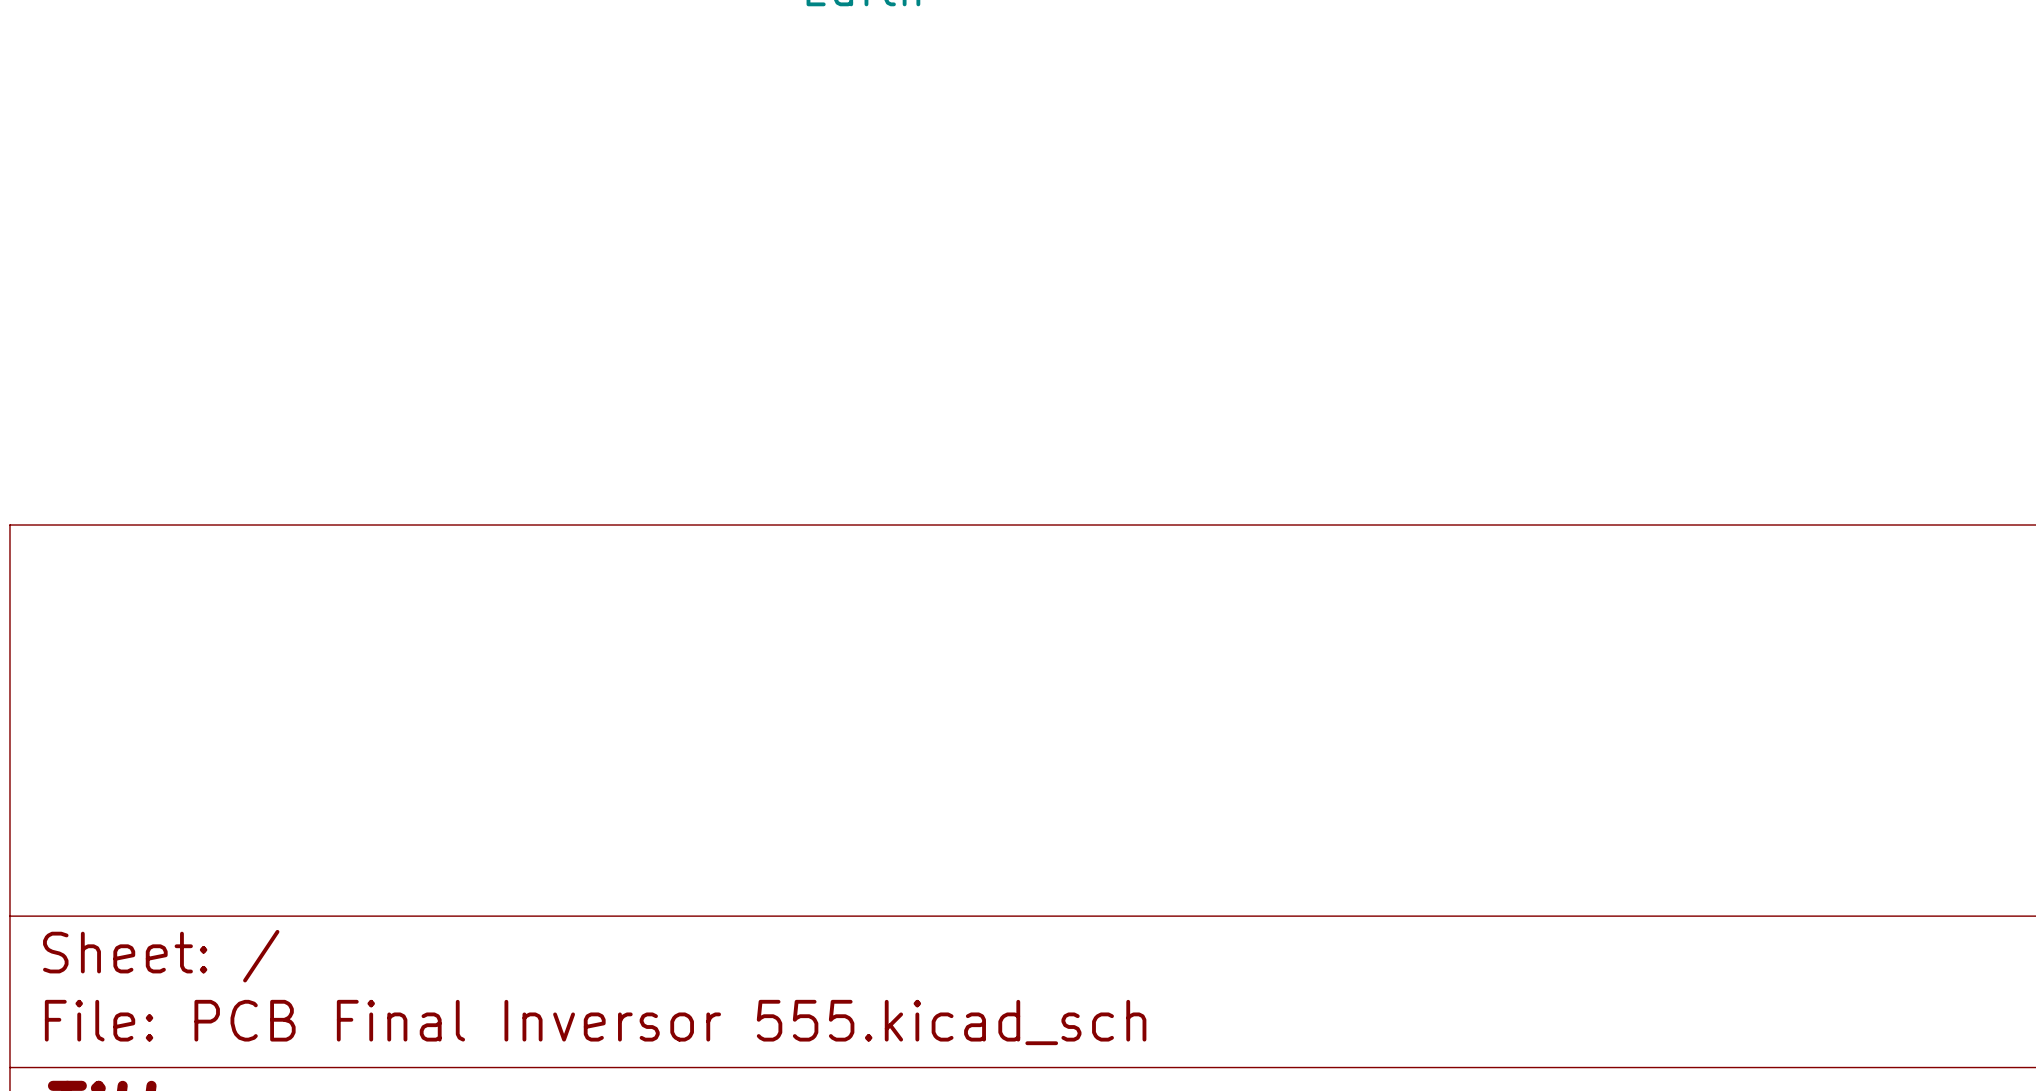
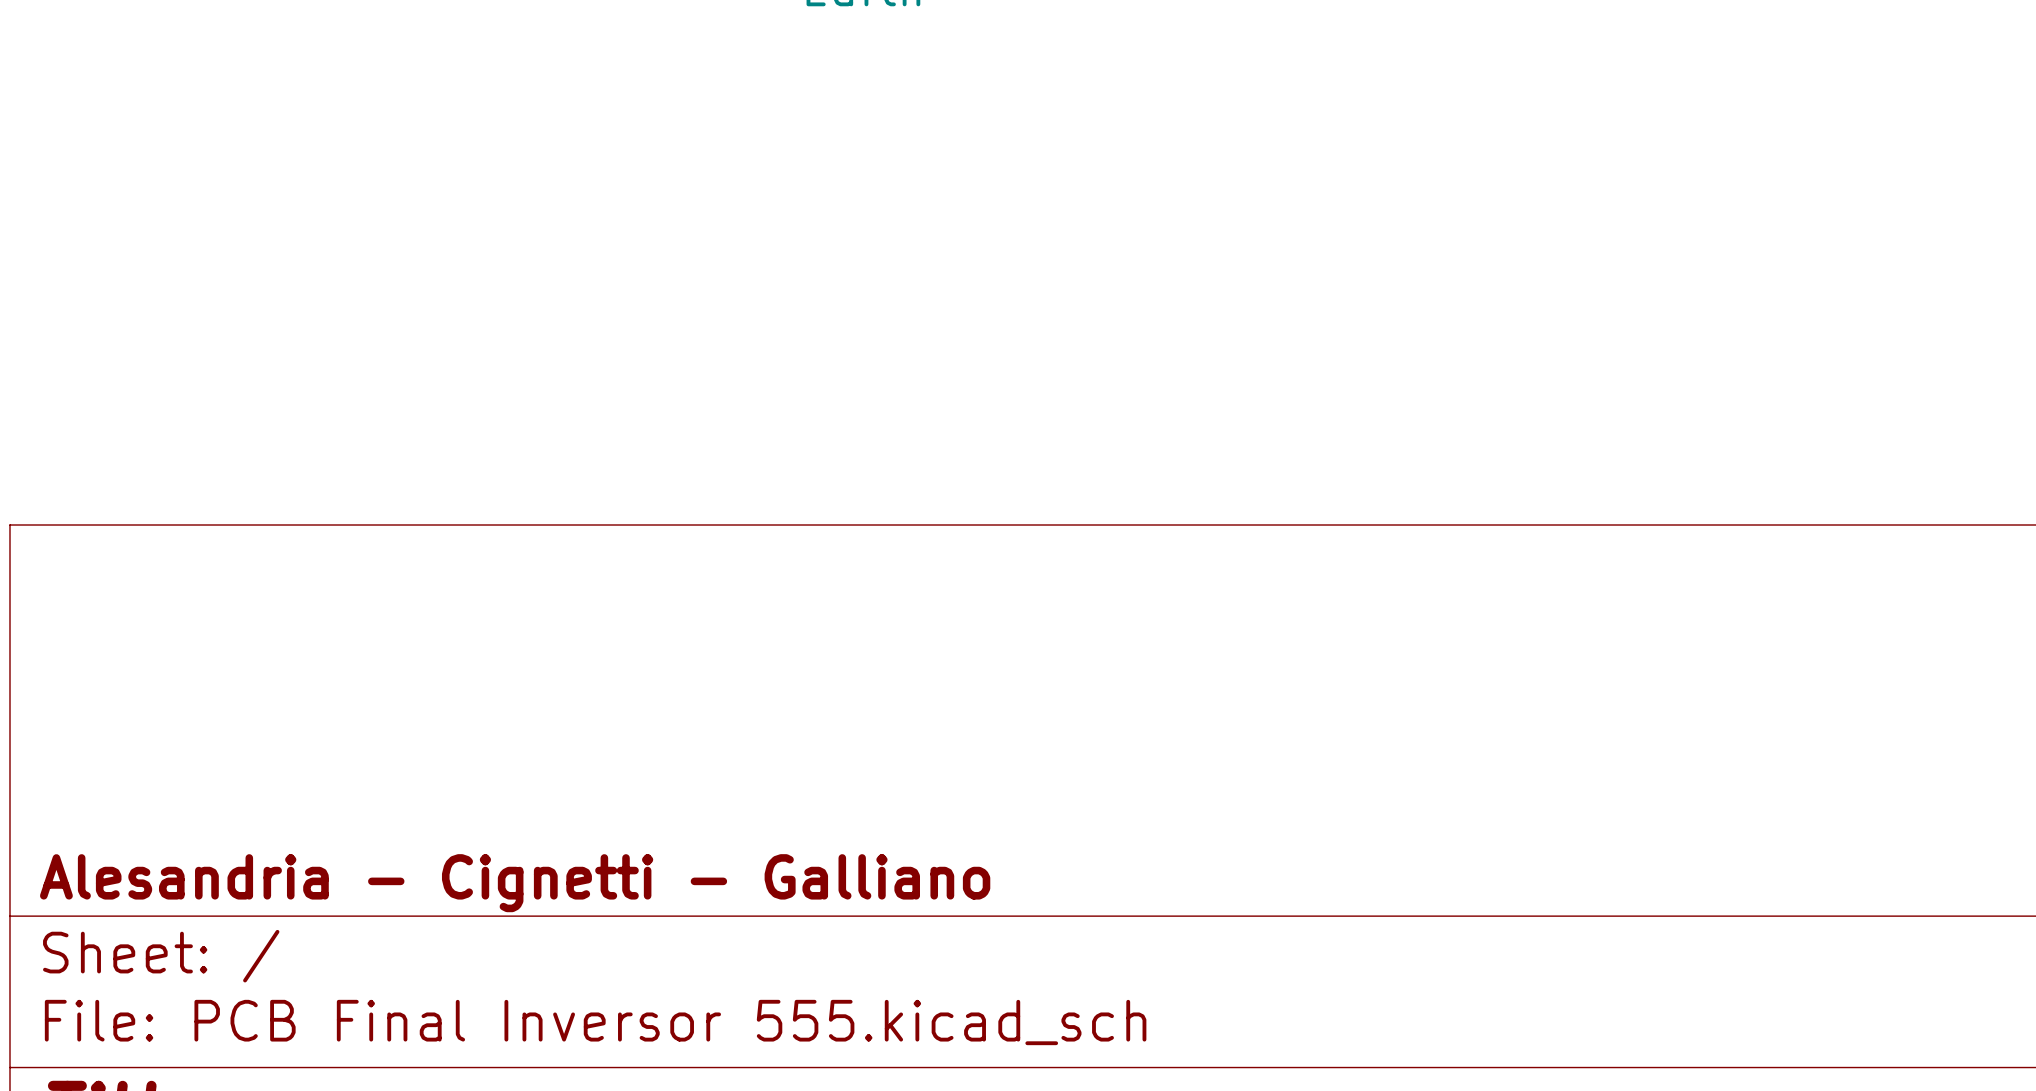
title block: none -> Alesandria - Cignetti - Galliano (515, 883)

